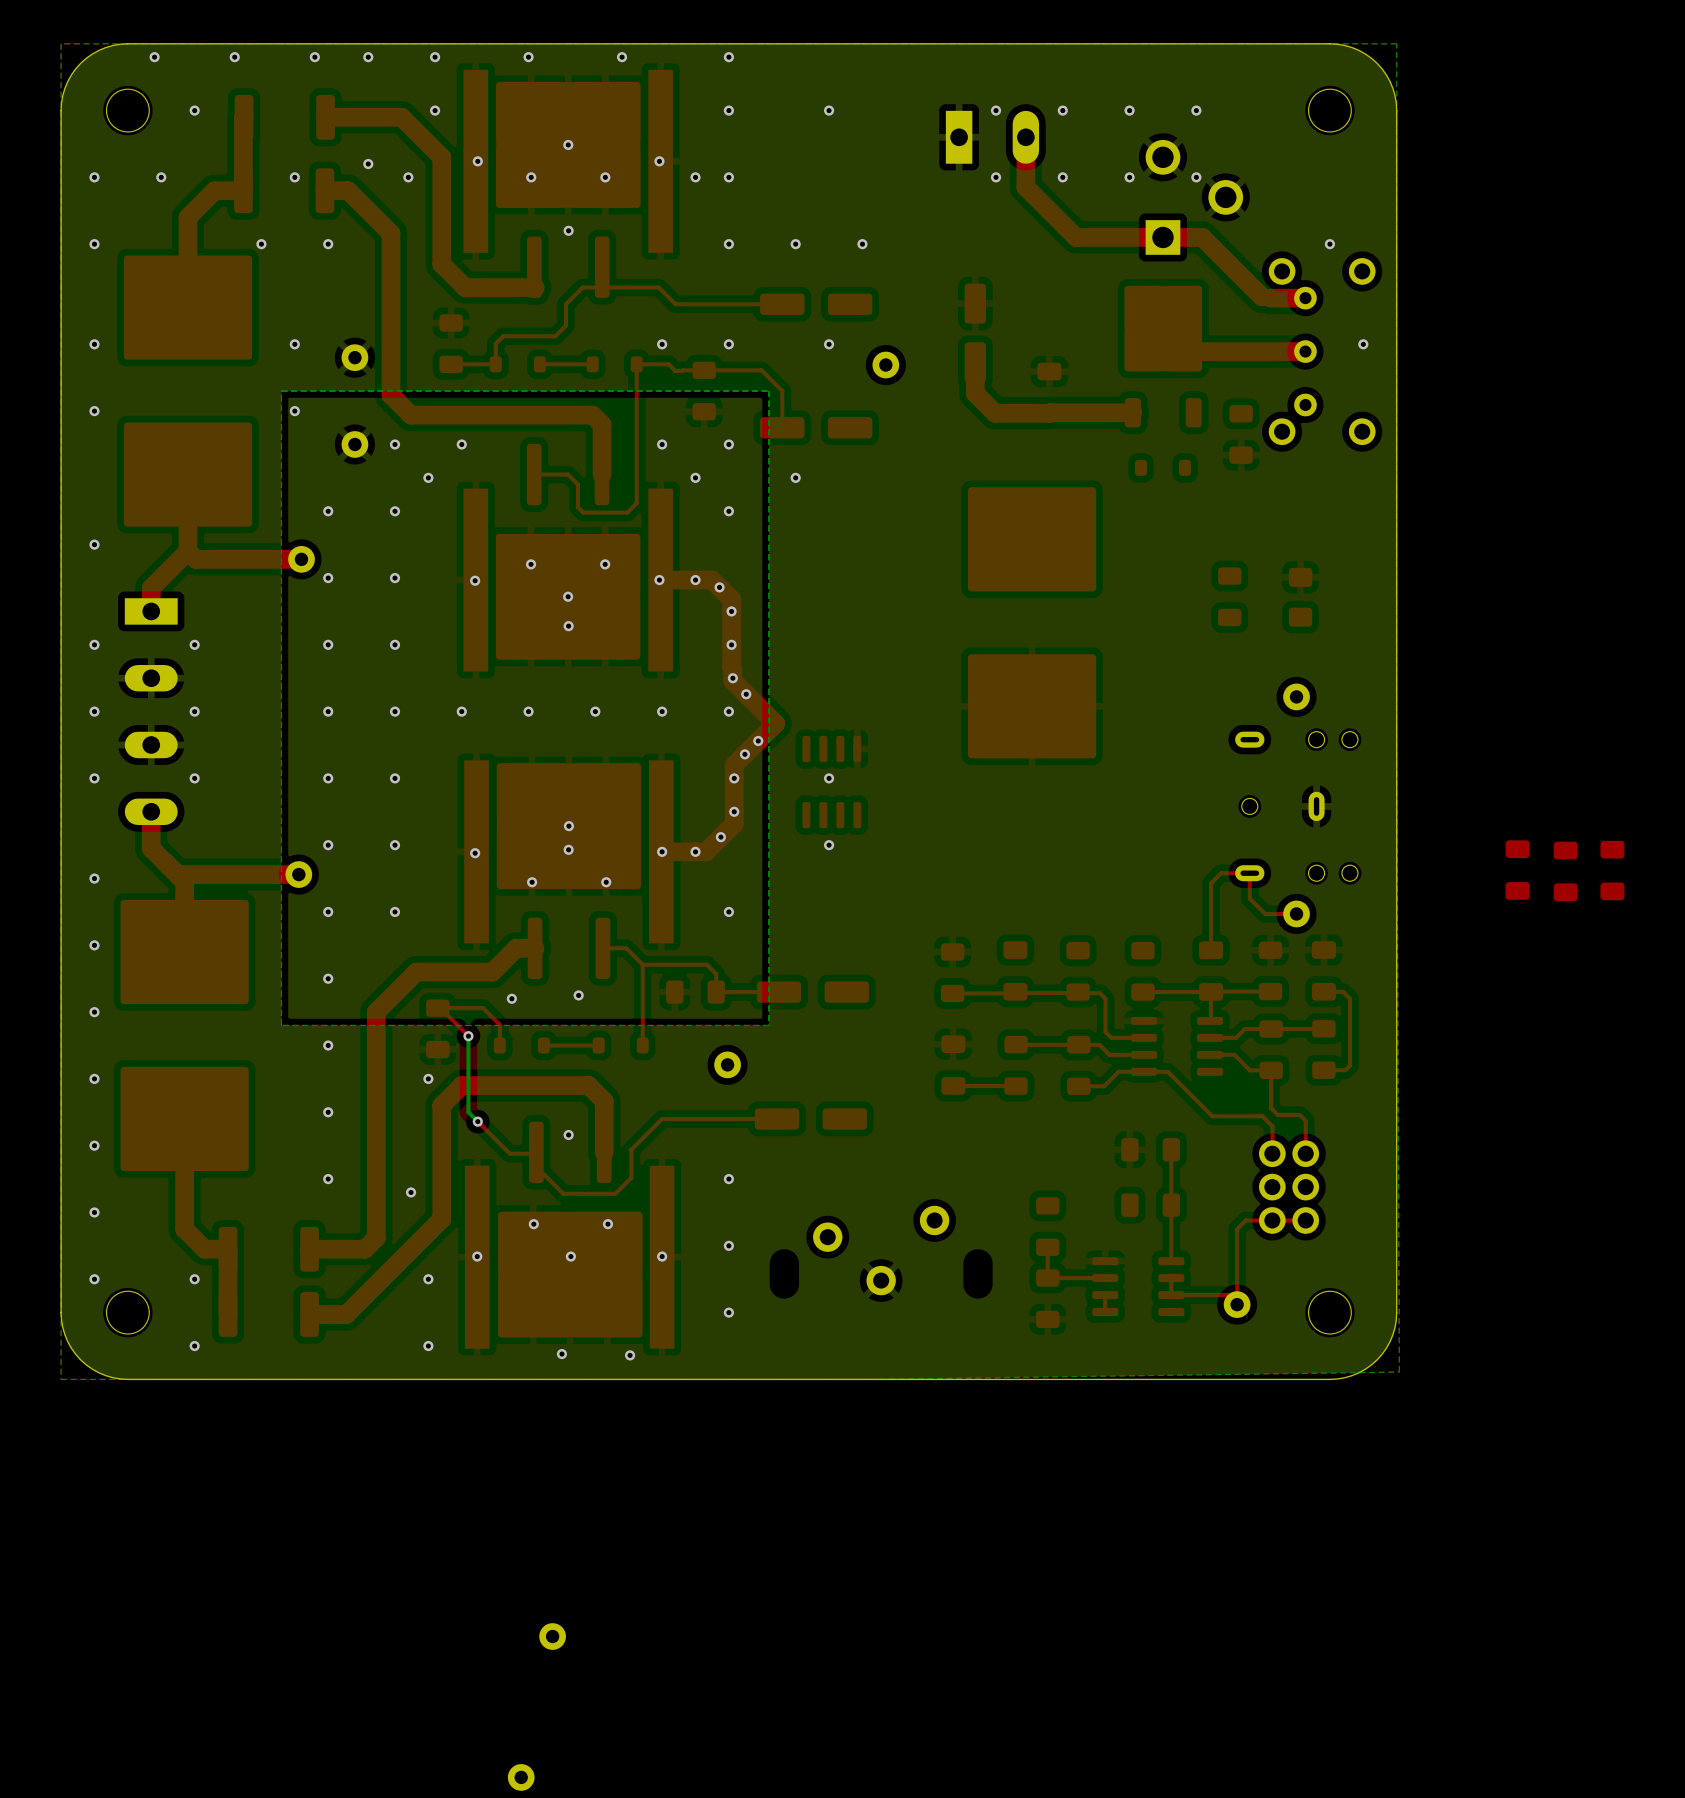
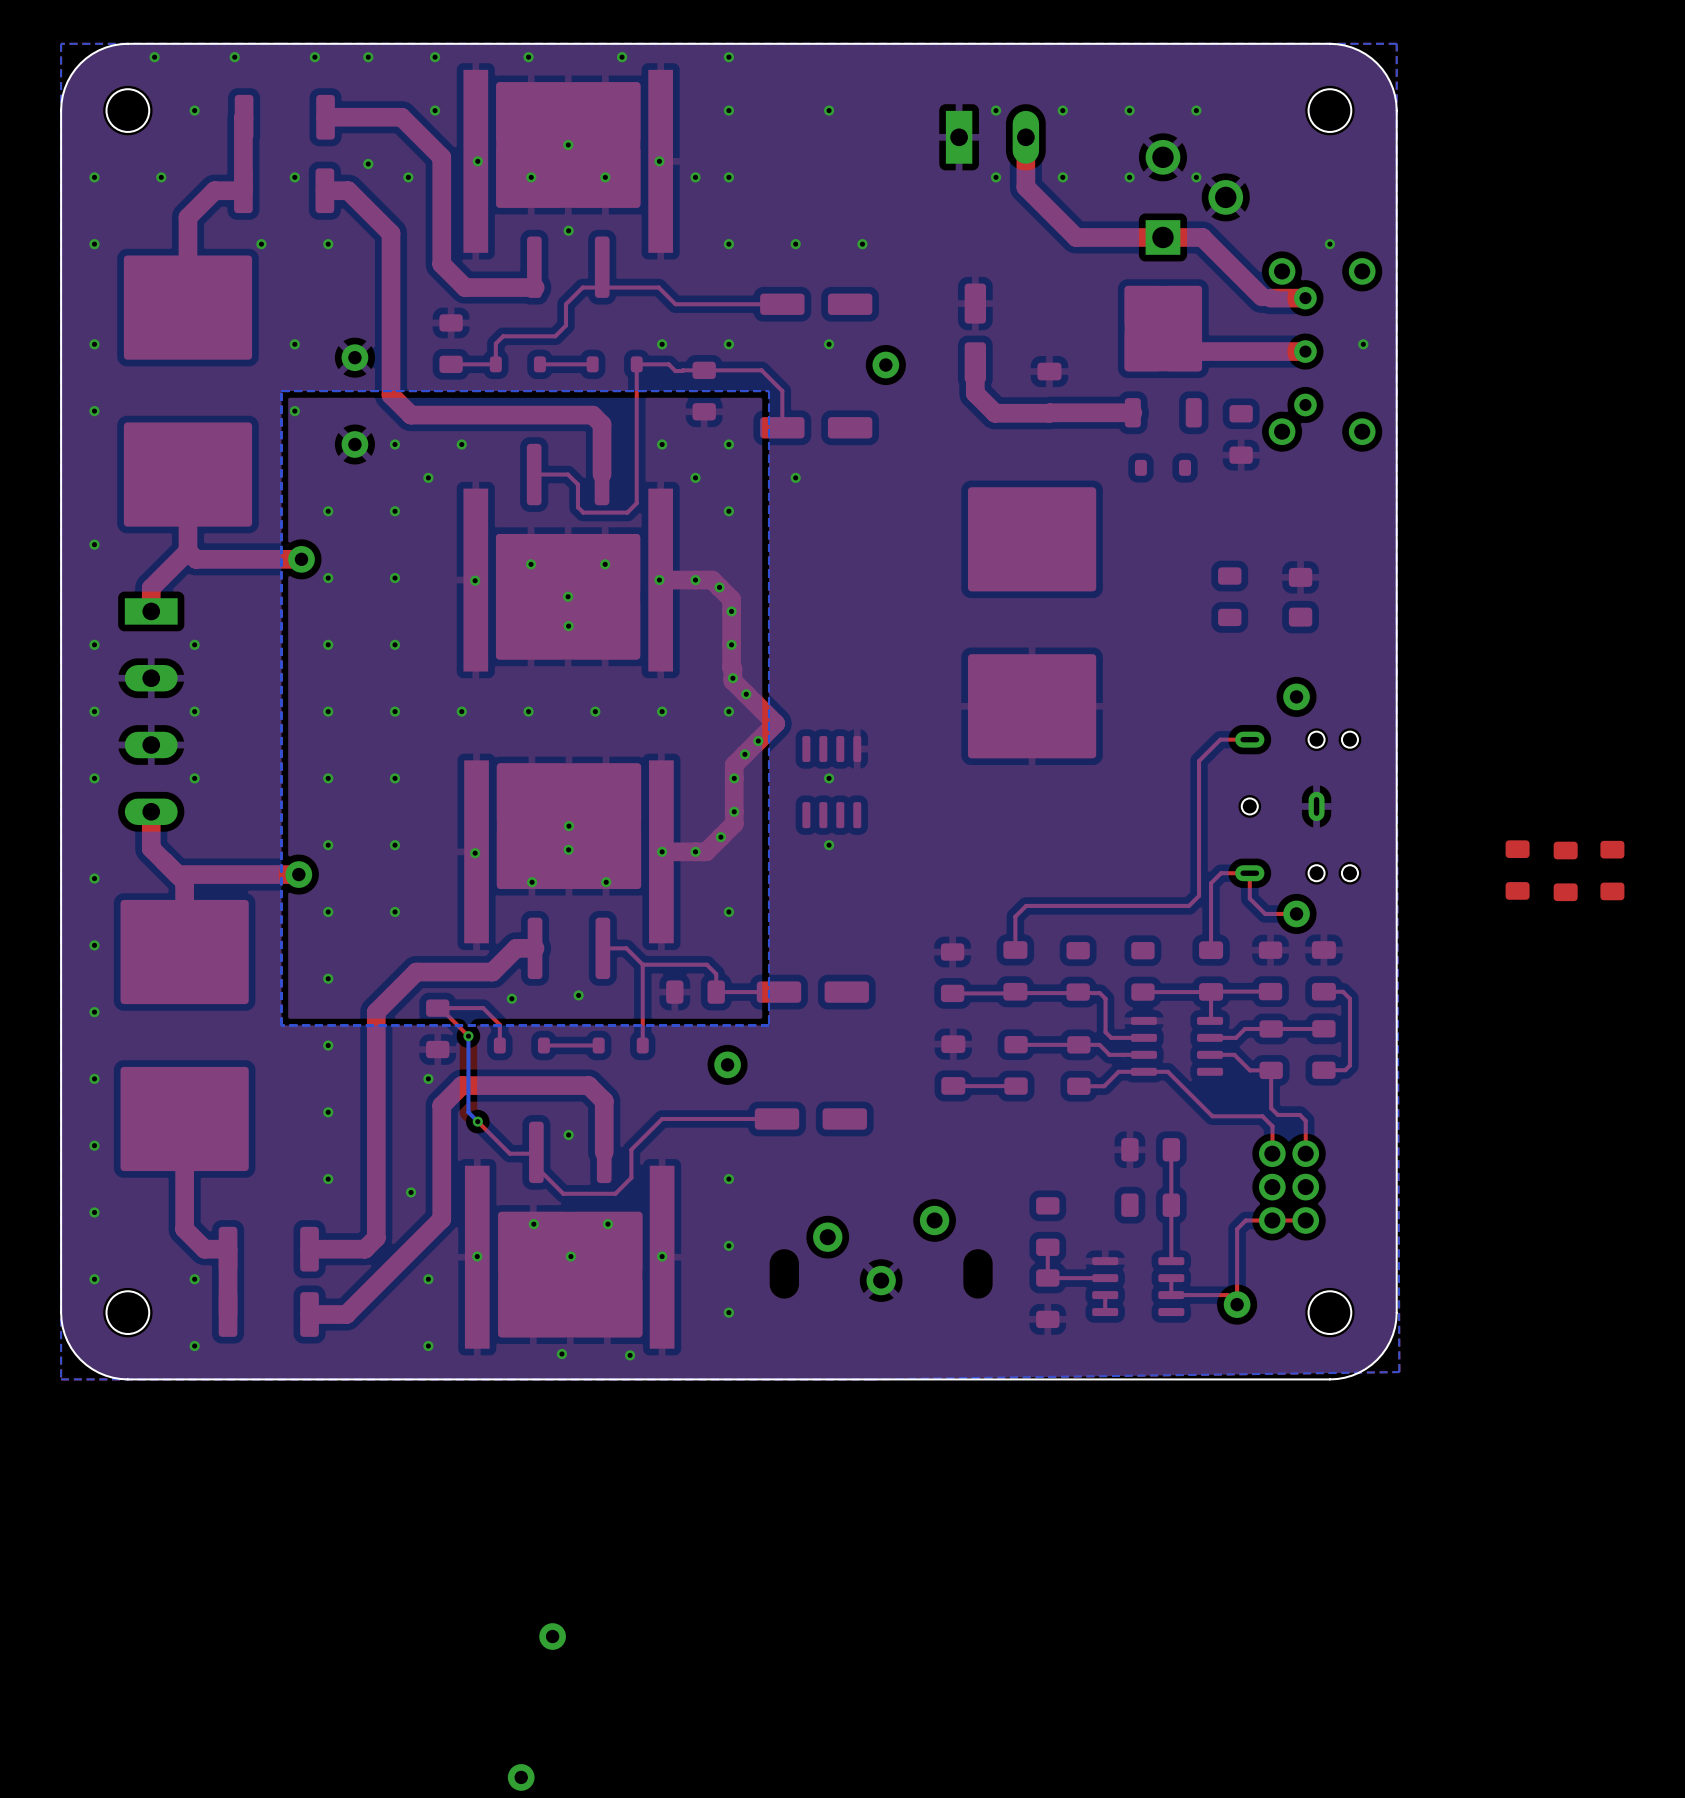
top track: none -> (1249, 739) (1220, 739) (1199, 761) (1199, 895) (1189, 905) (1026, 905) (1015, 916) (1015, 950)

